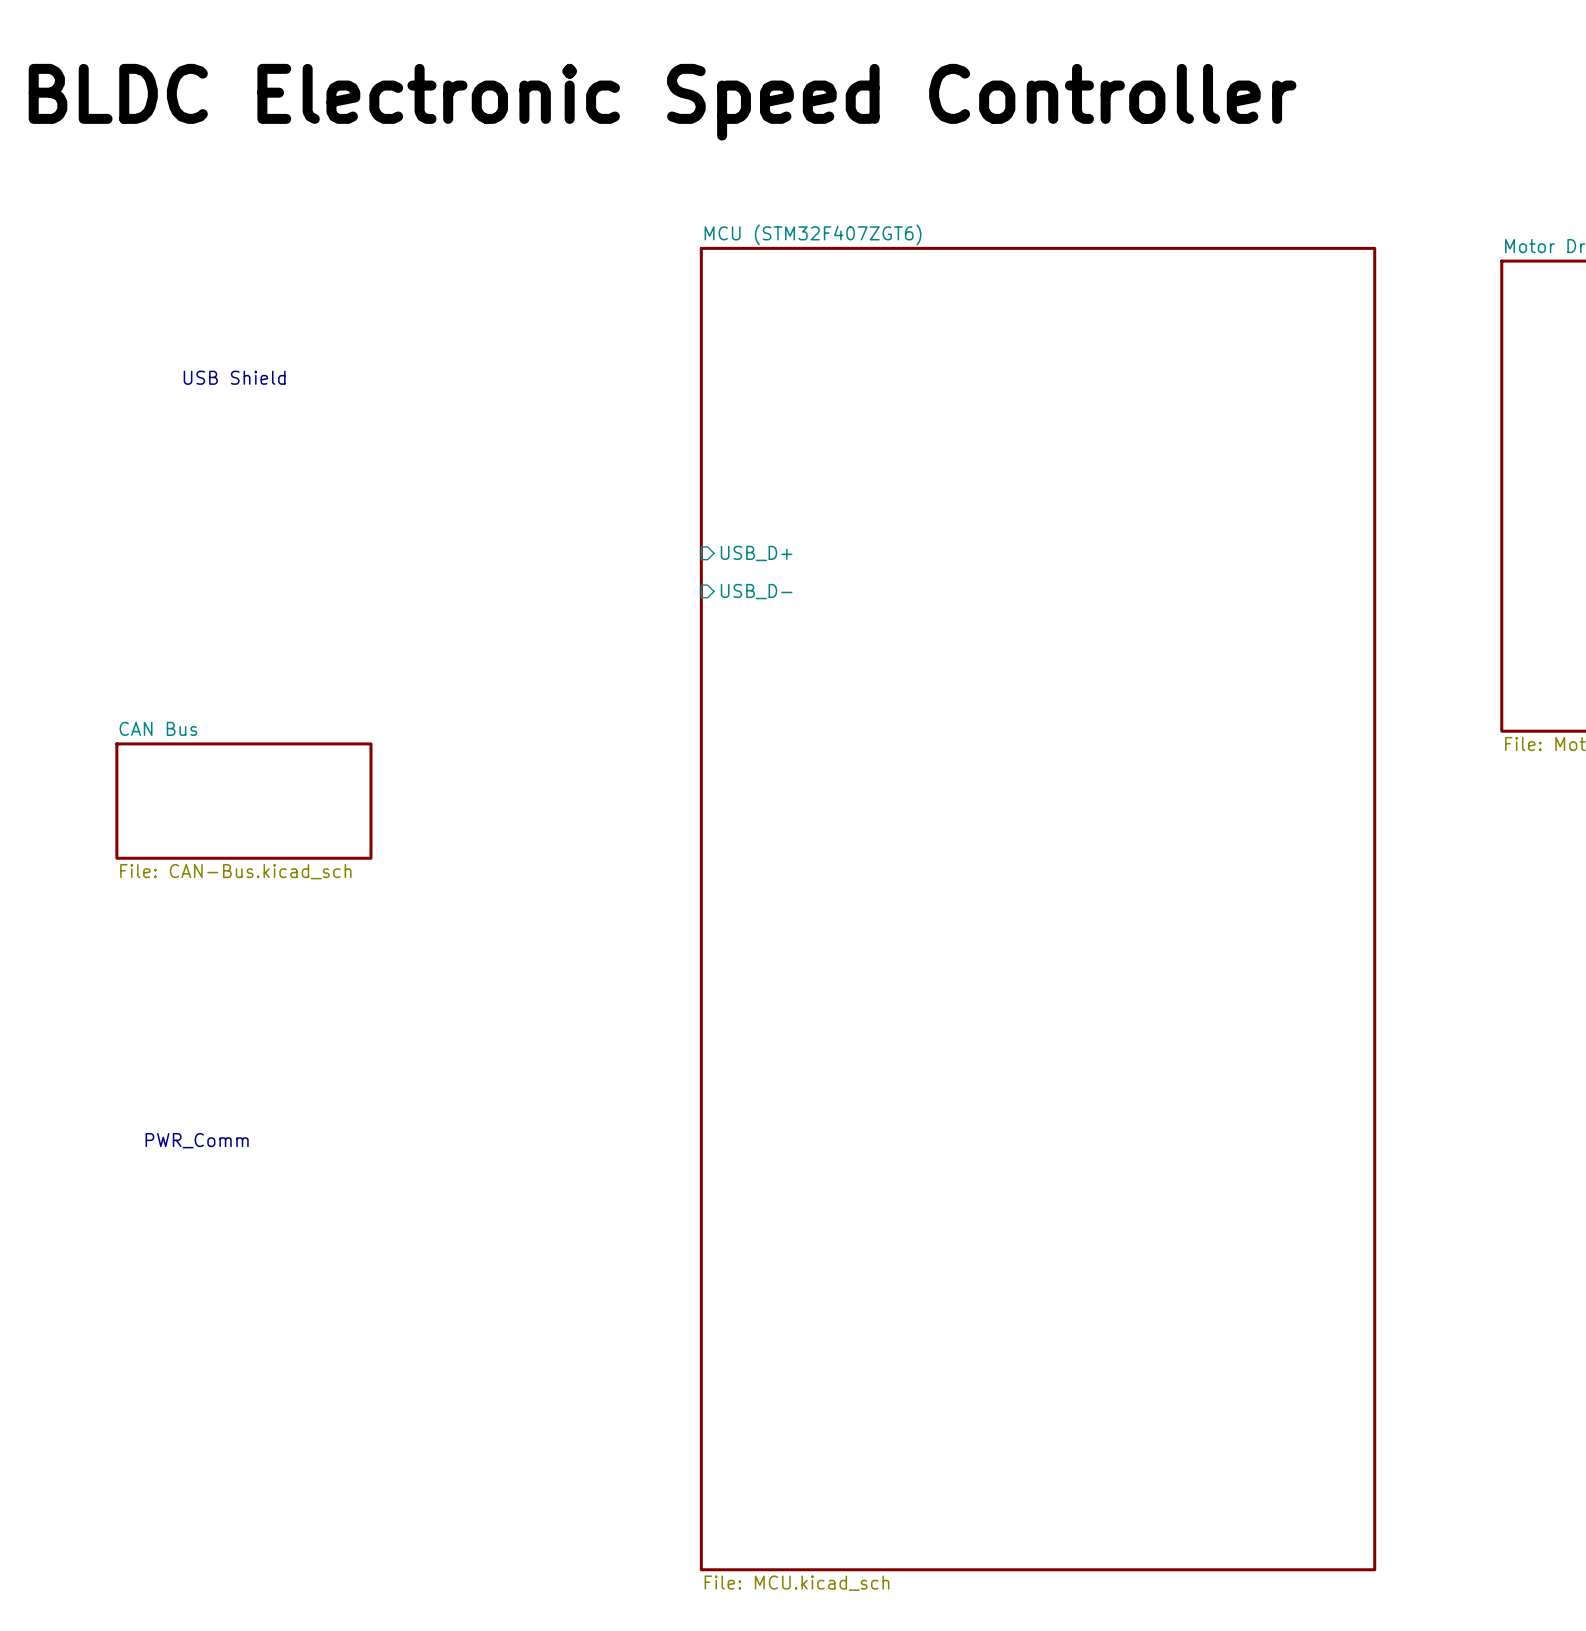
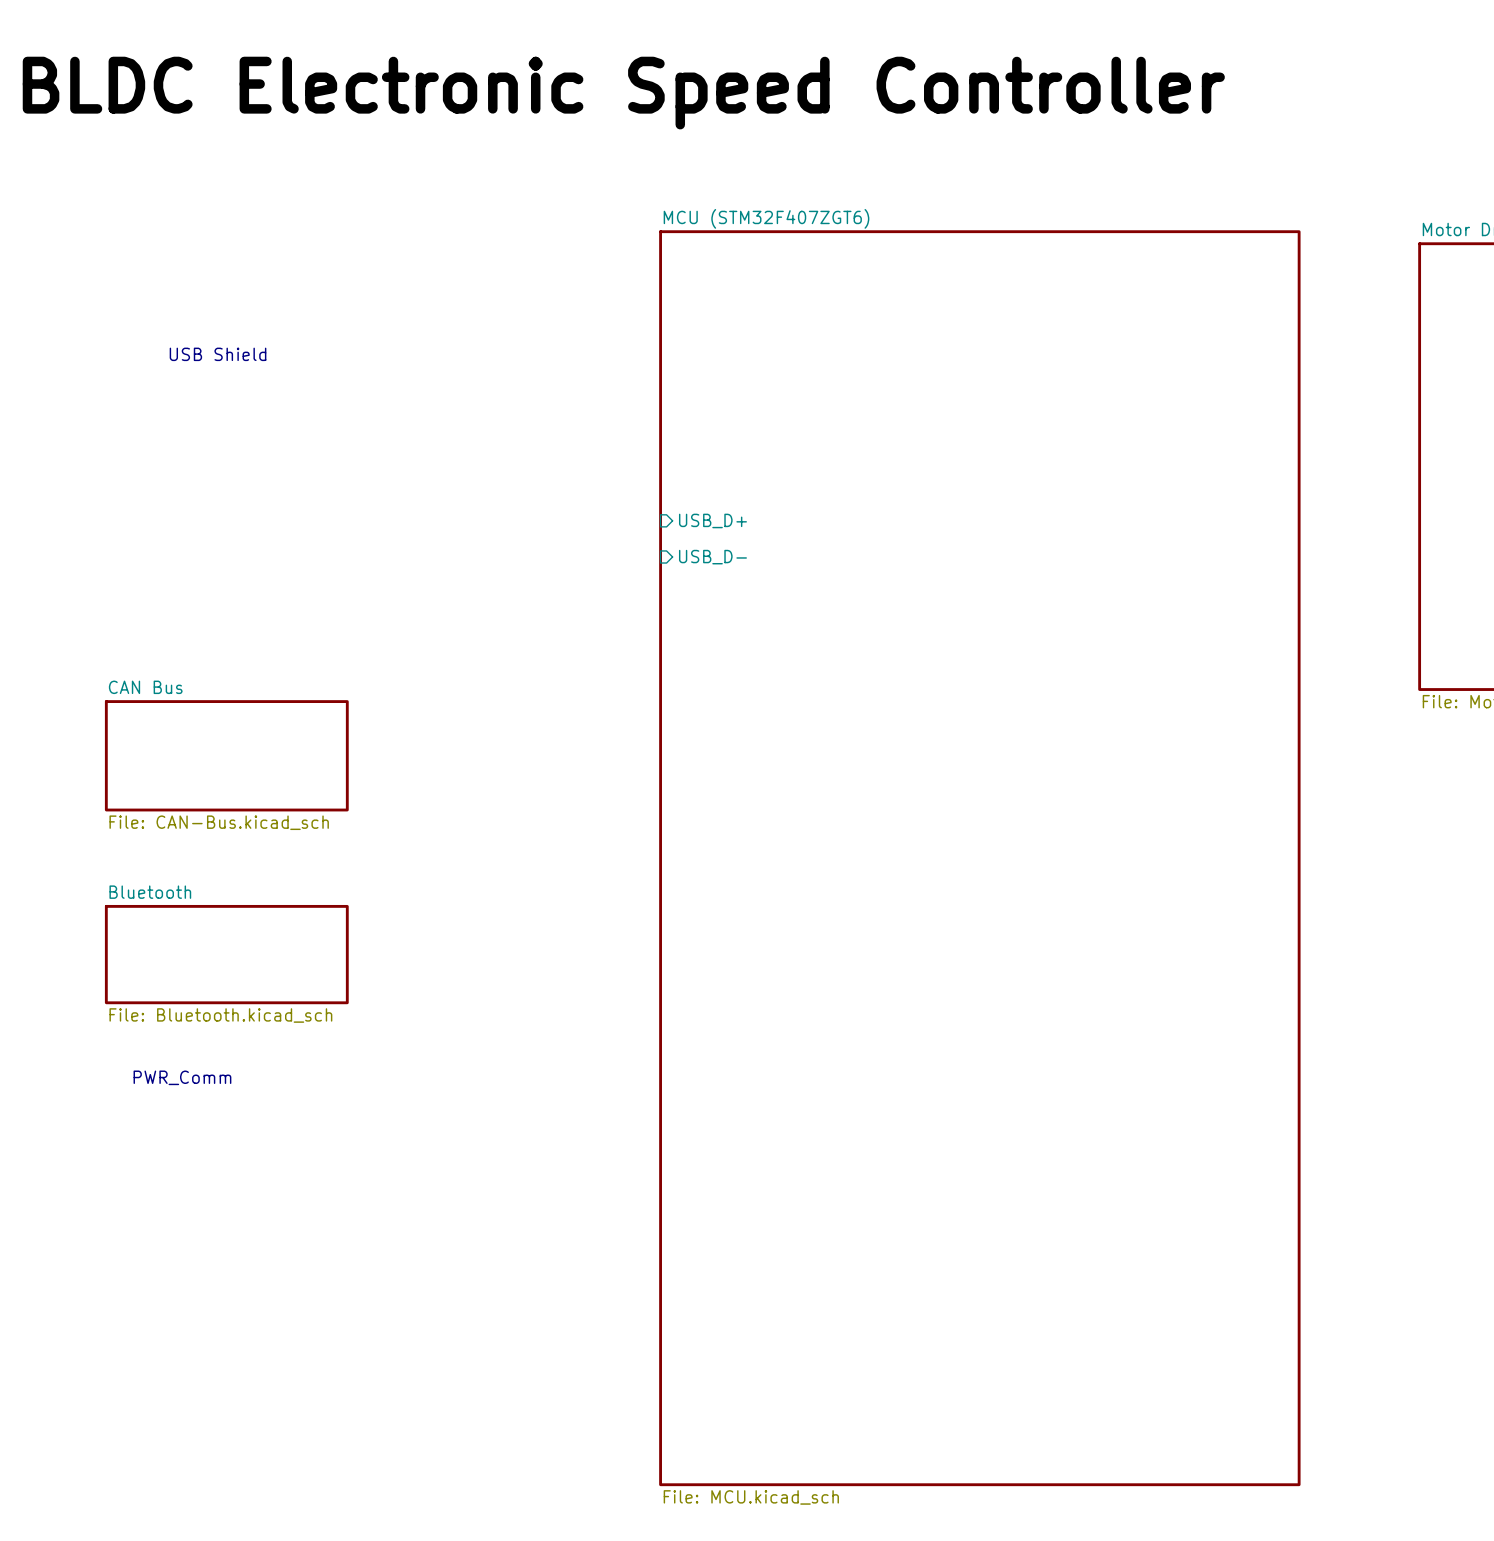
sheet Bluetooth: none -> File: Bluetooth.kicad_sch (226, 954)

